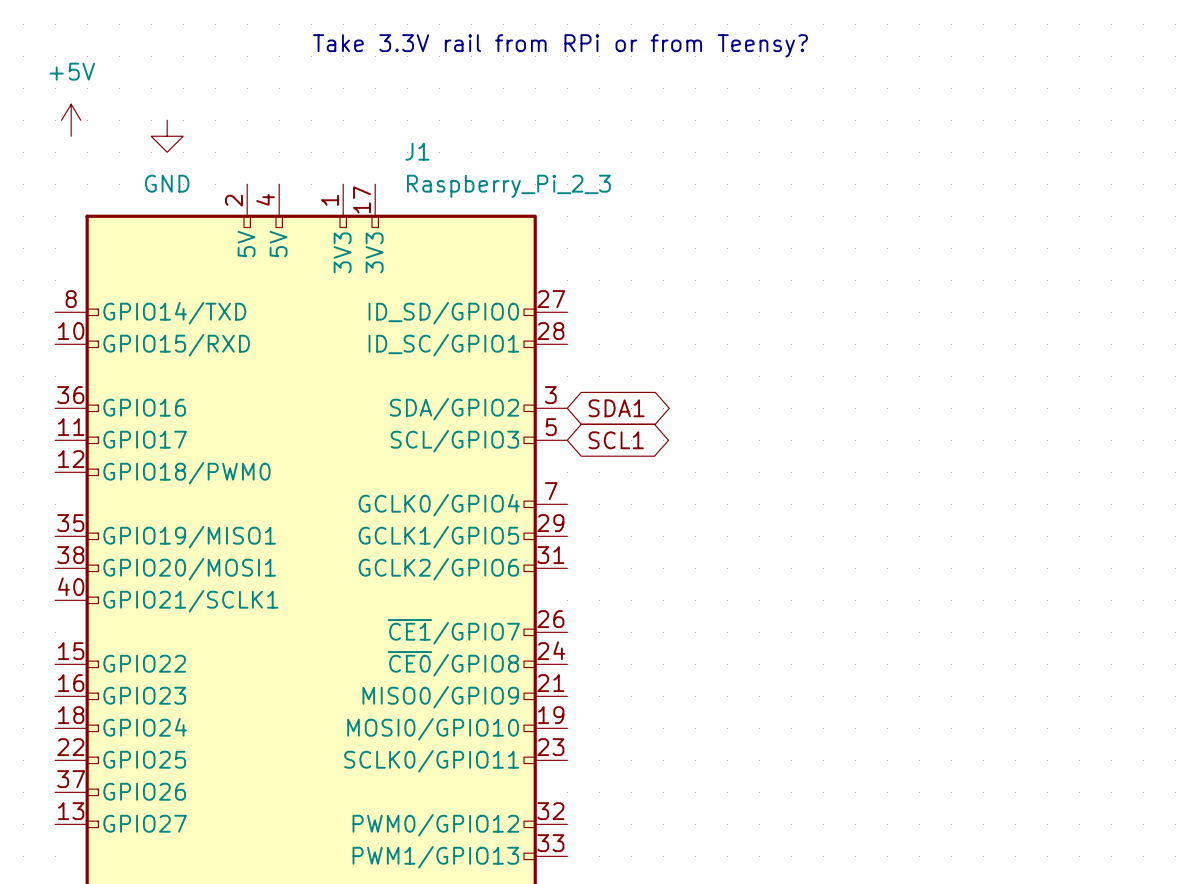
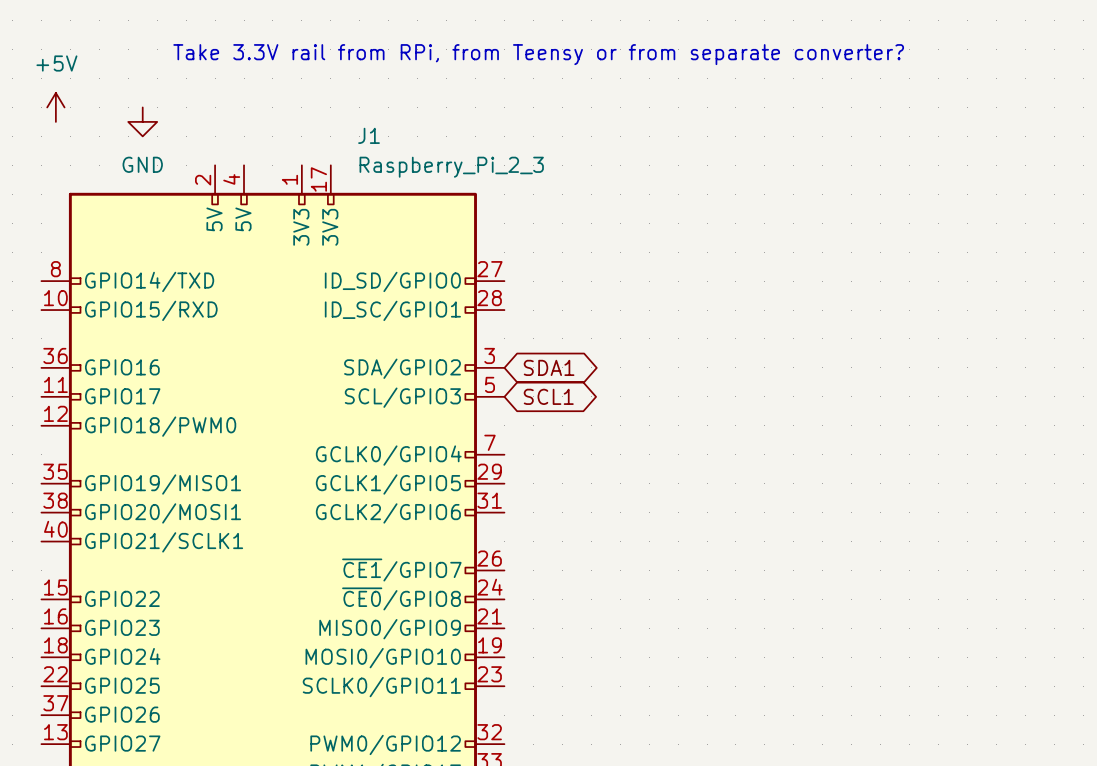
text: Take 3.3V rail from RPi or from Teensy? (560, 45) -> Take 3.3V rail from RPi, from Teensy or from separate converter? (538, 54)

